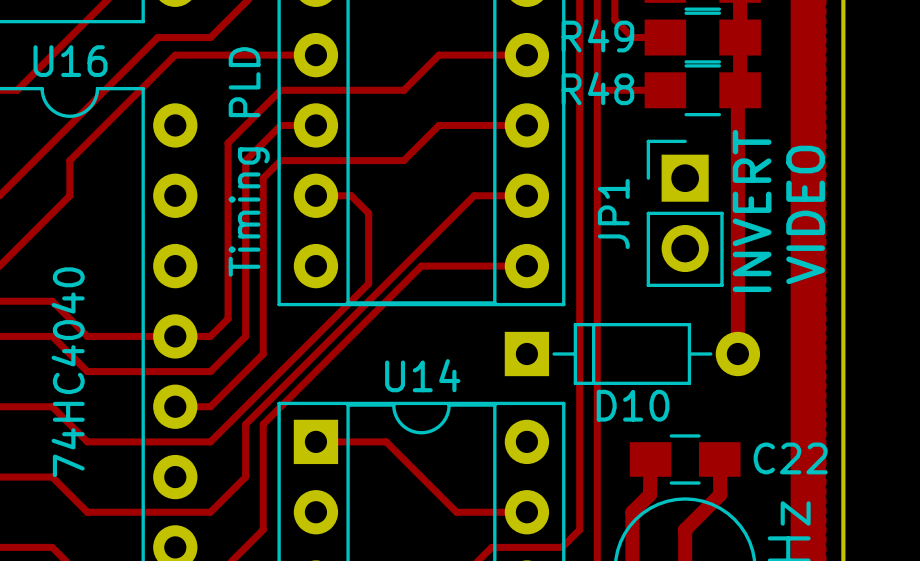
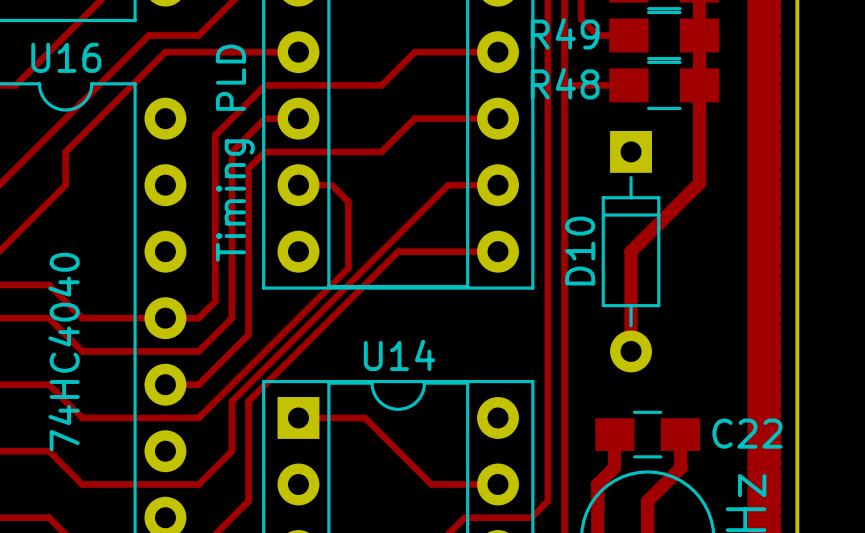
track: (740, 90) (737, 92) (737, 354) -> (699, 85) (699, 183) (631, 251) (631, 351)
text: INVERT (752, 210) -> none
JP1: (685, 213) -> none
text: VIDEO (805, 214) -> none
D10 rotation: 0° (632, 354) -> 90° clockwise (631, 251)

